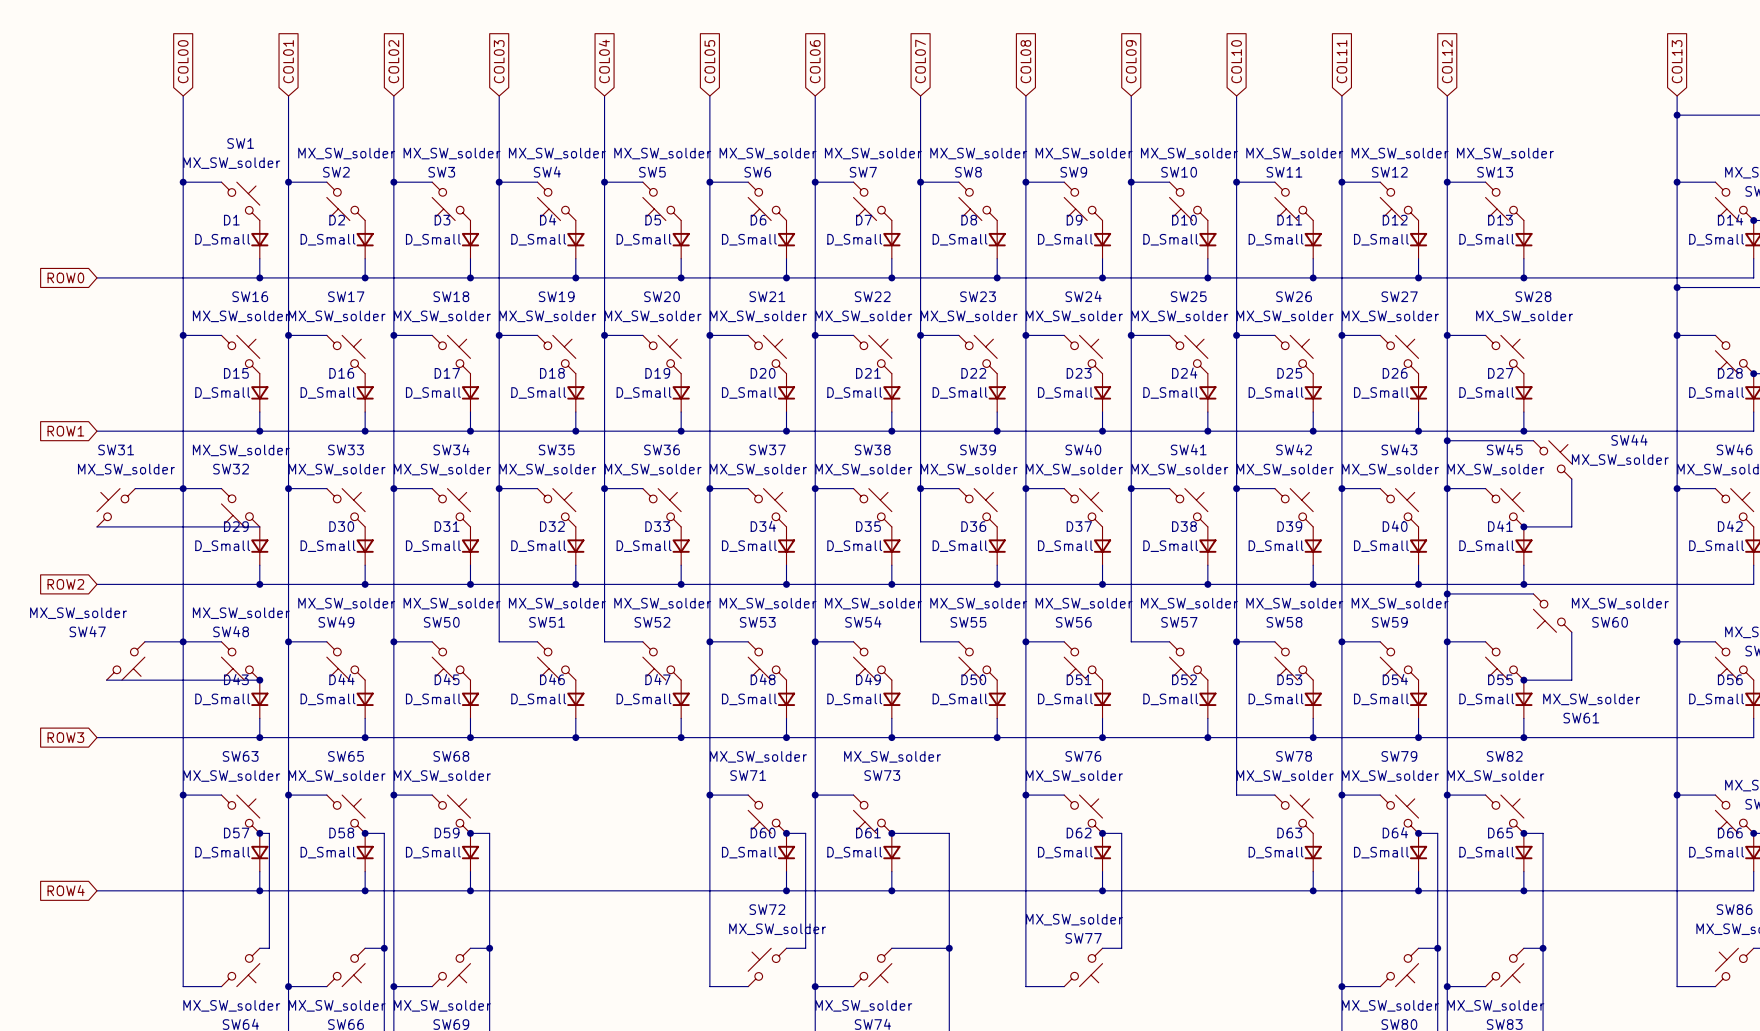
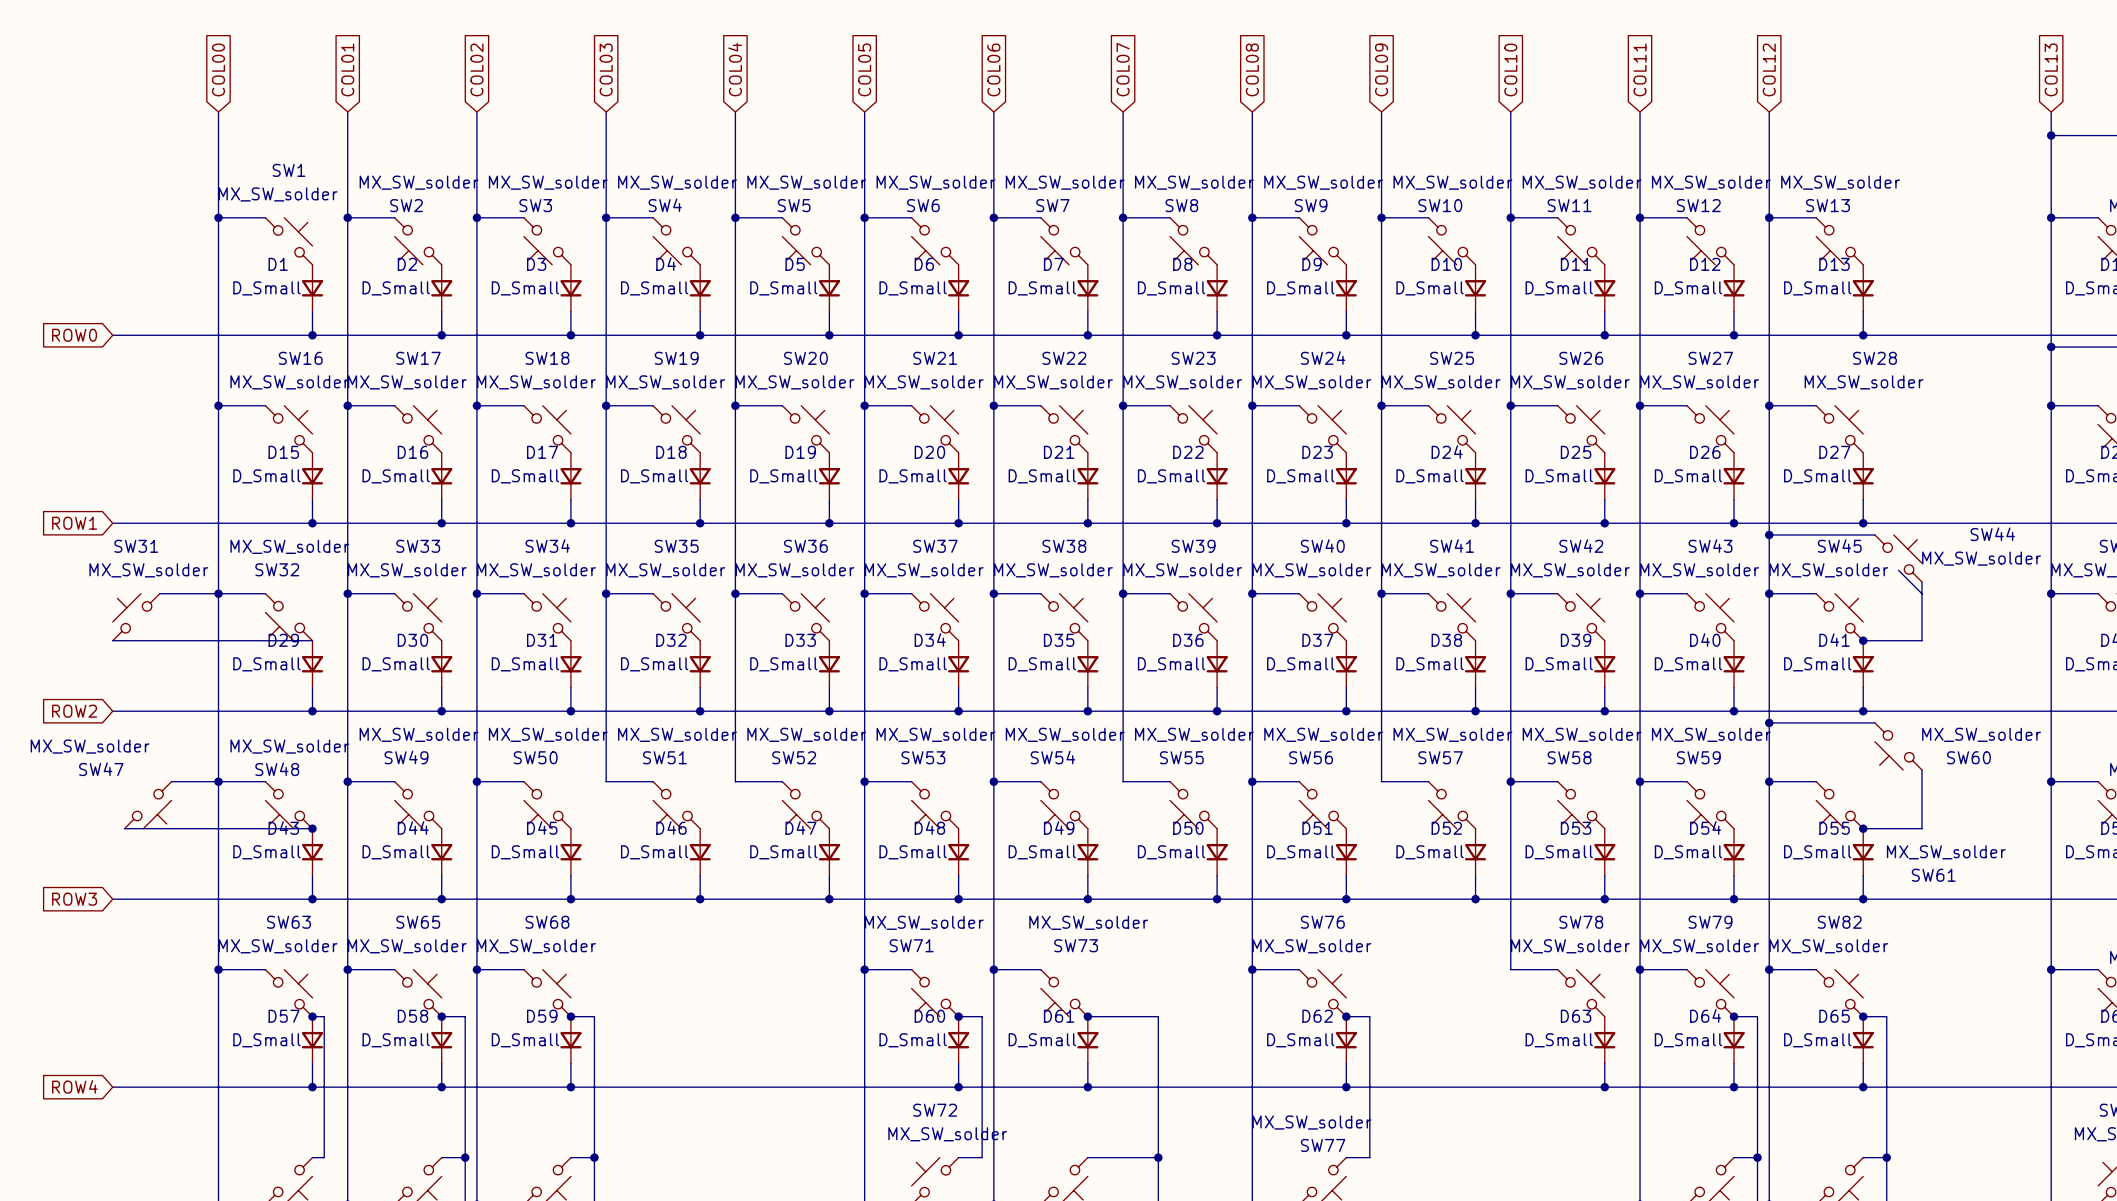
wire: none -> (1898, 570) (1921, 593)

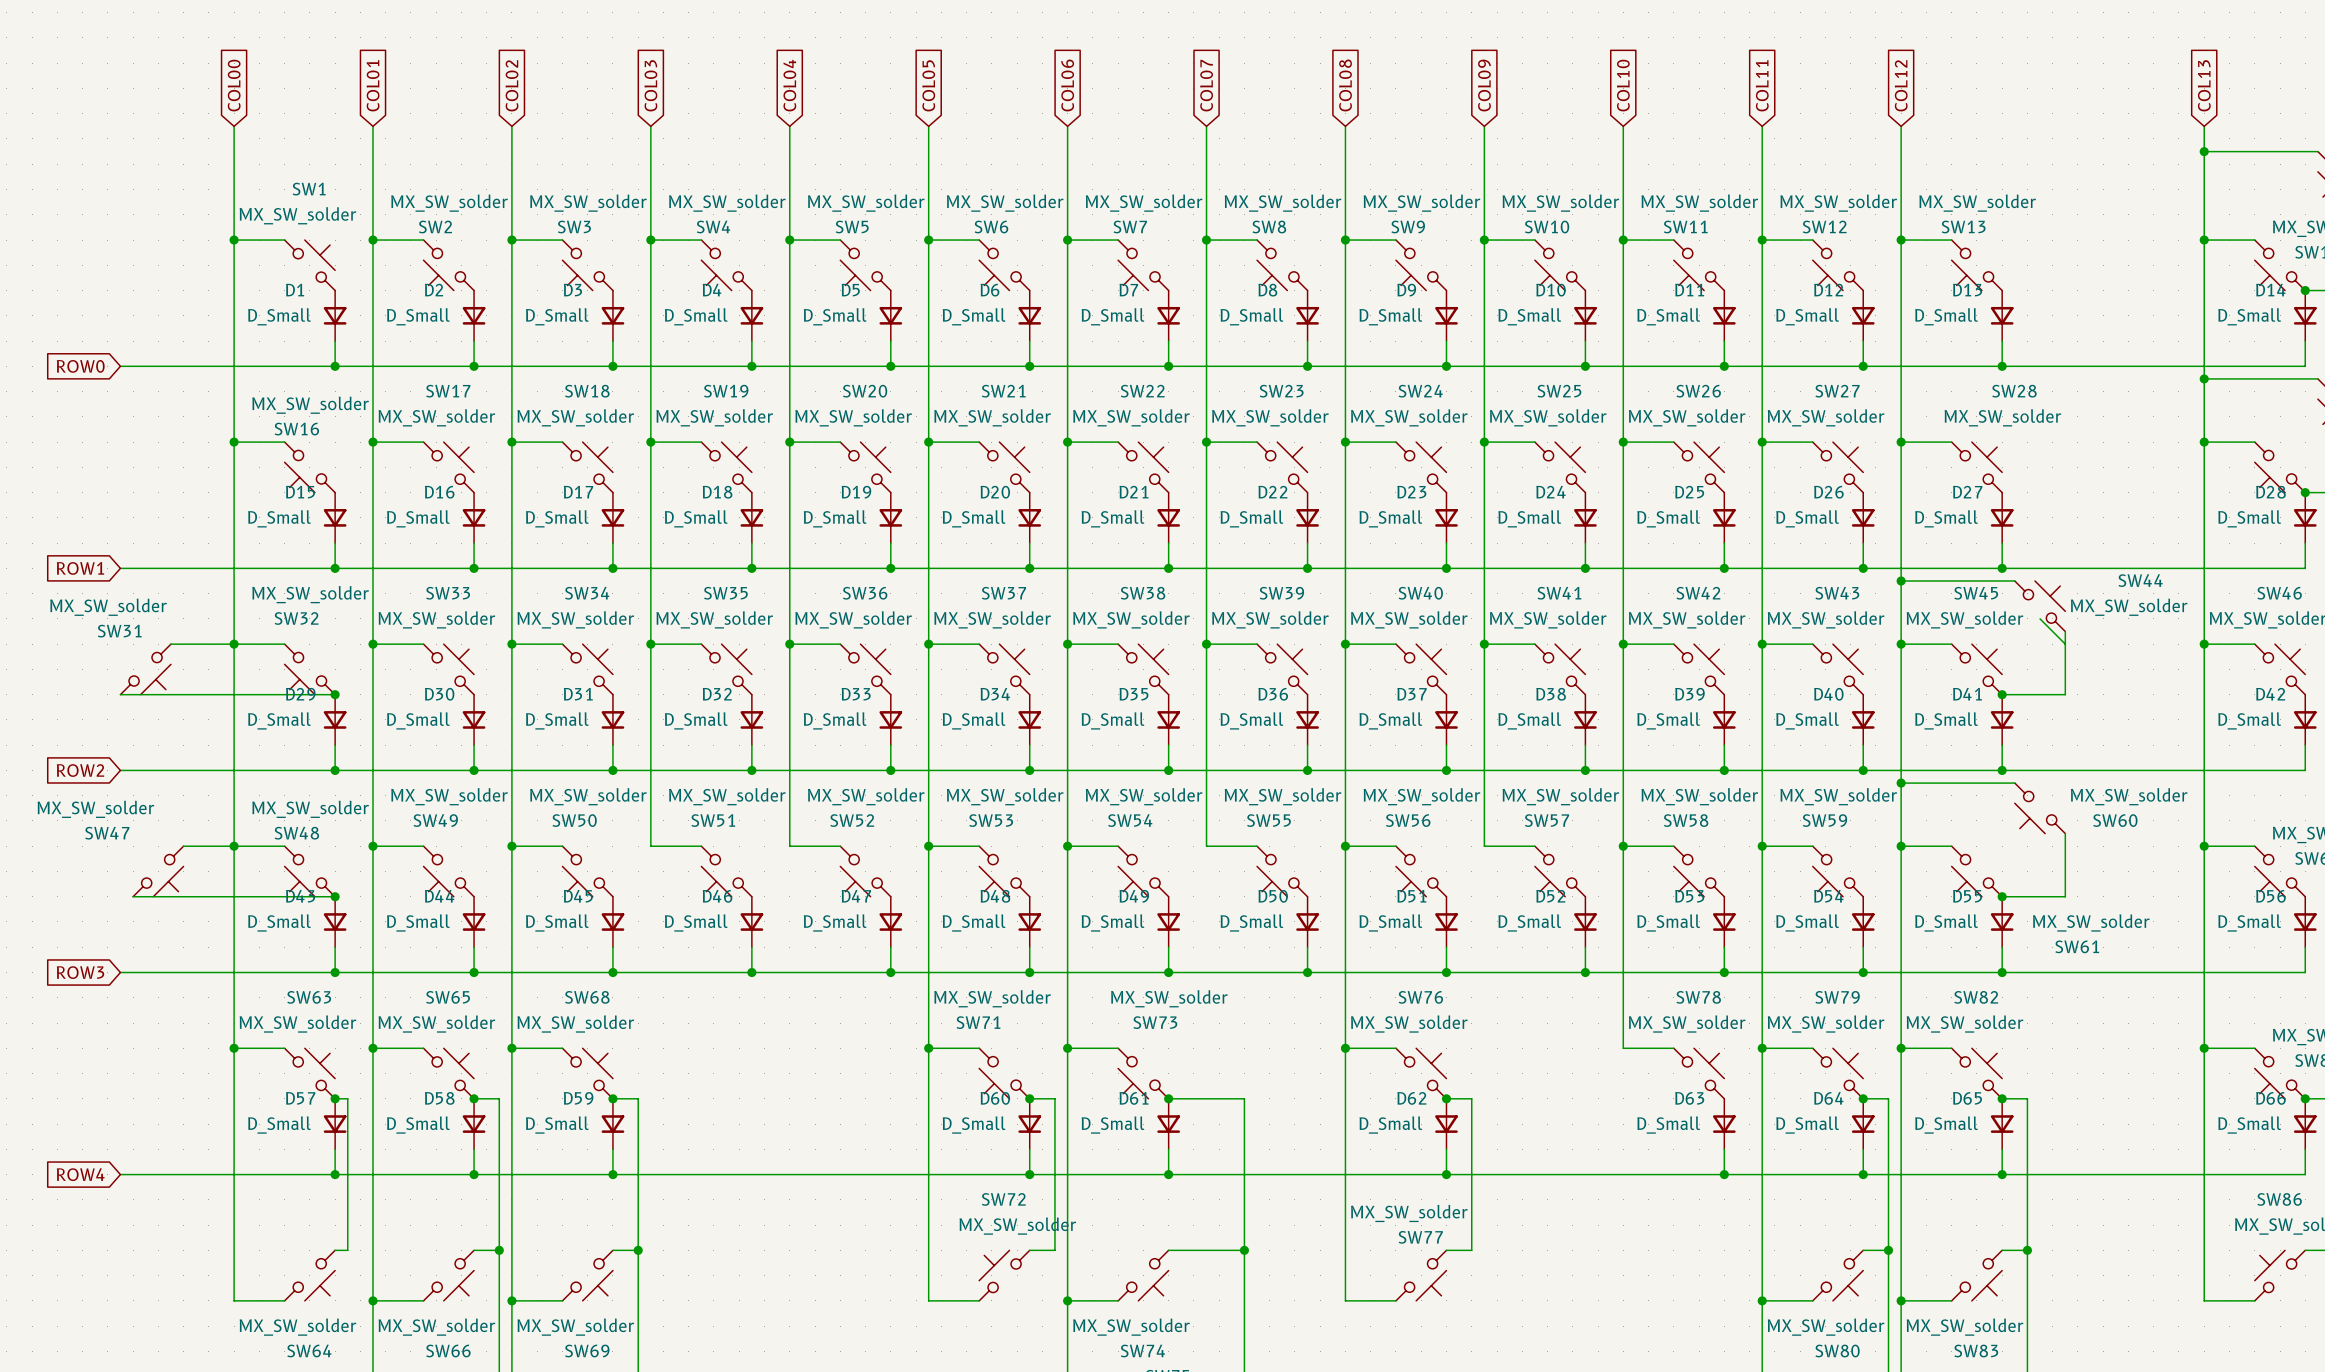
SW16 name position: SW16 (300, 358) -> SW16 (296, 429)
SW16 rotation: 0° (288, 429) -> 180° (309, 467)
SW31 name position: SW31 (136, 546) -> SW31 (119, 631)
SW31 value position: MX_SW_solder (148, 570) -> MX_SW_solder (108, 607)
SW31 rotation: 0° (136, 617) -> 180° (145, 669)
junction: none -> (335, 694)

